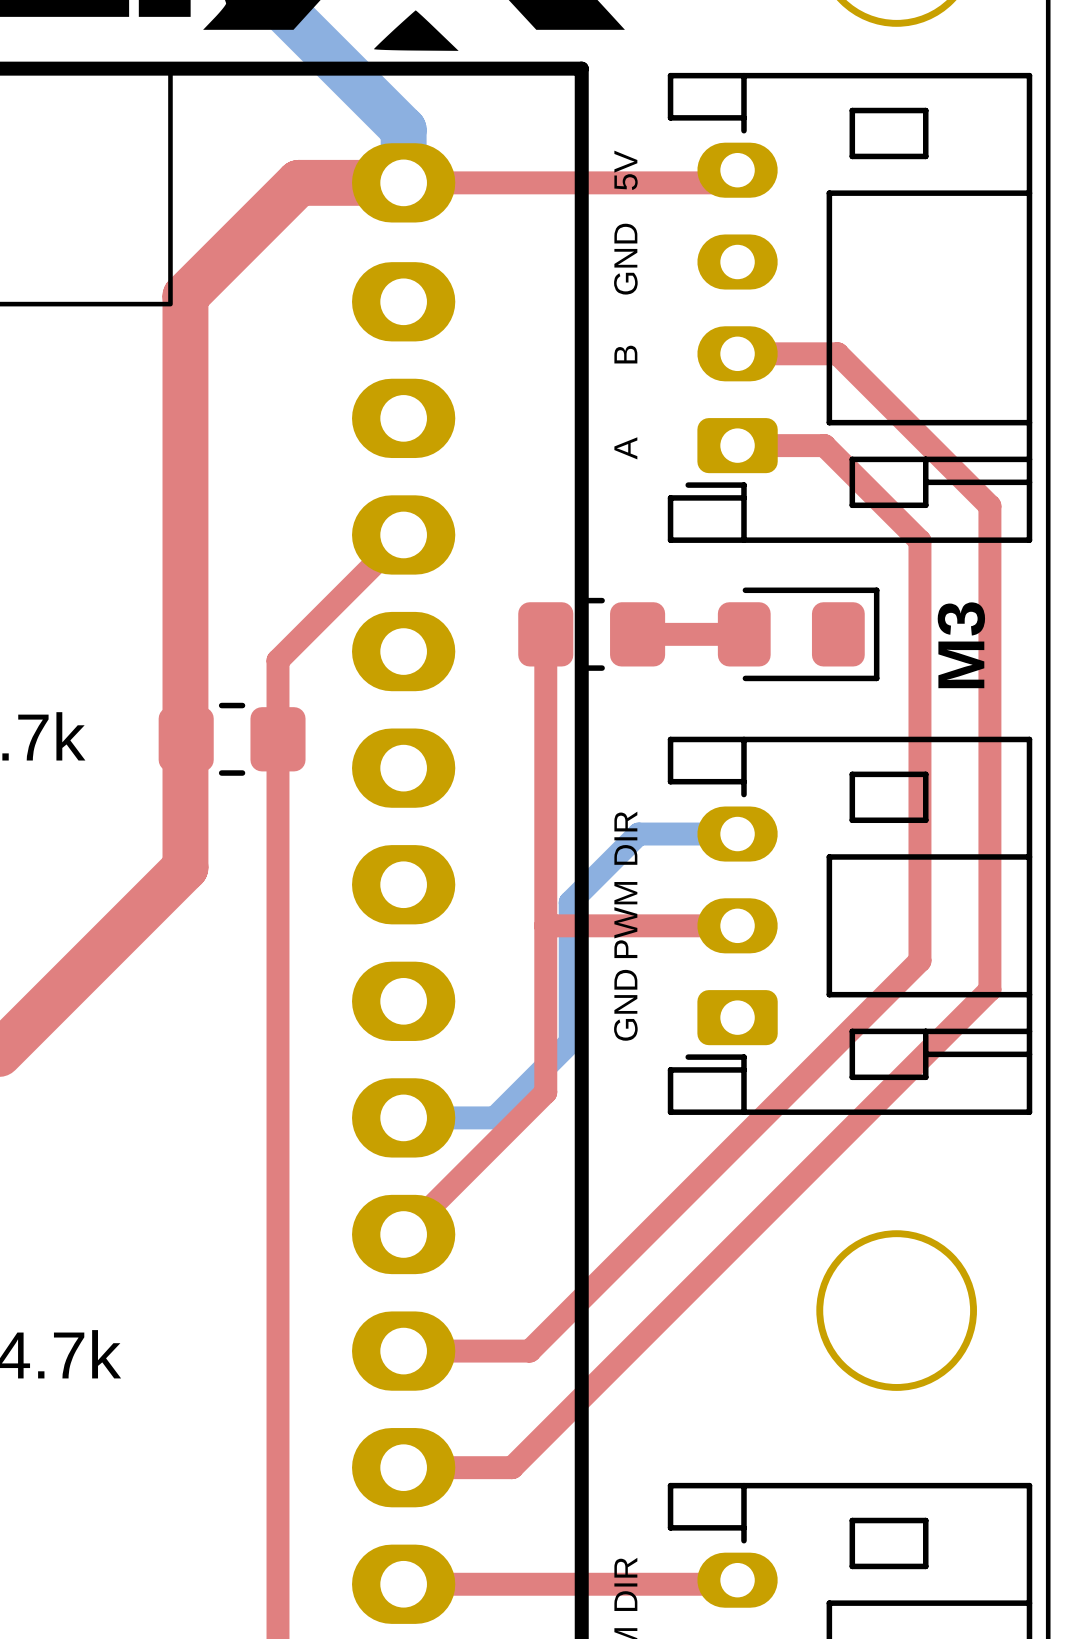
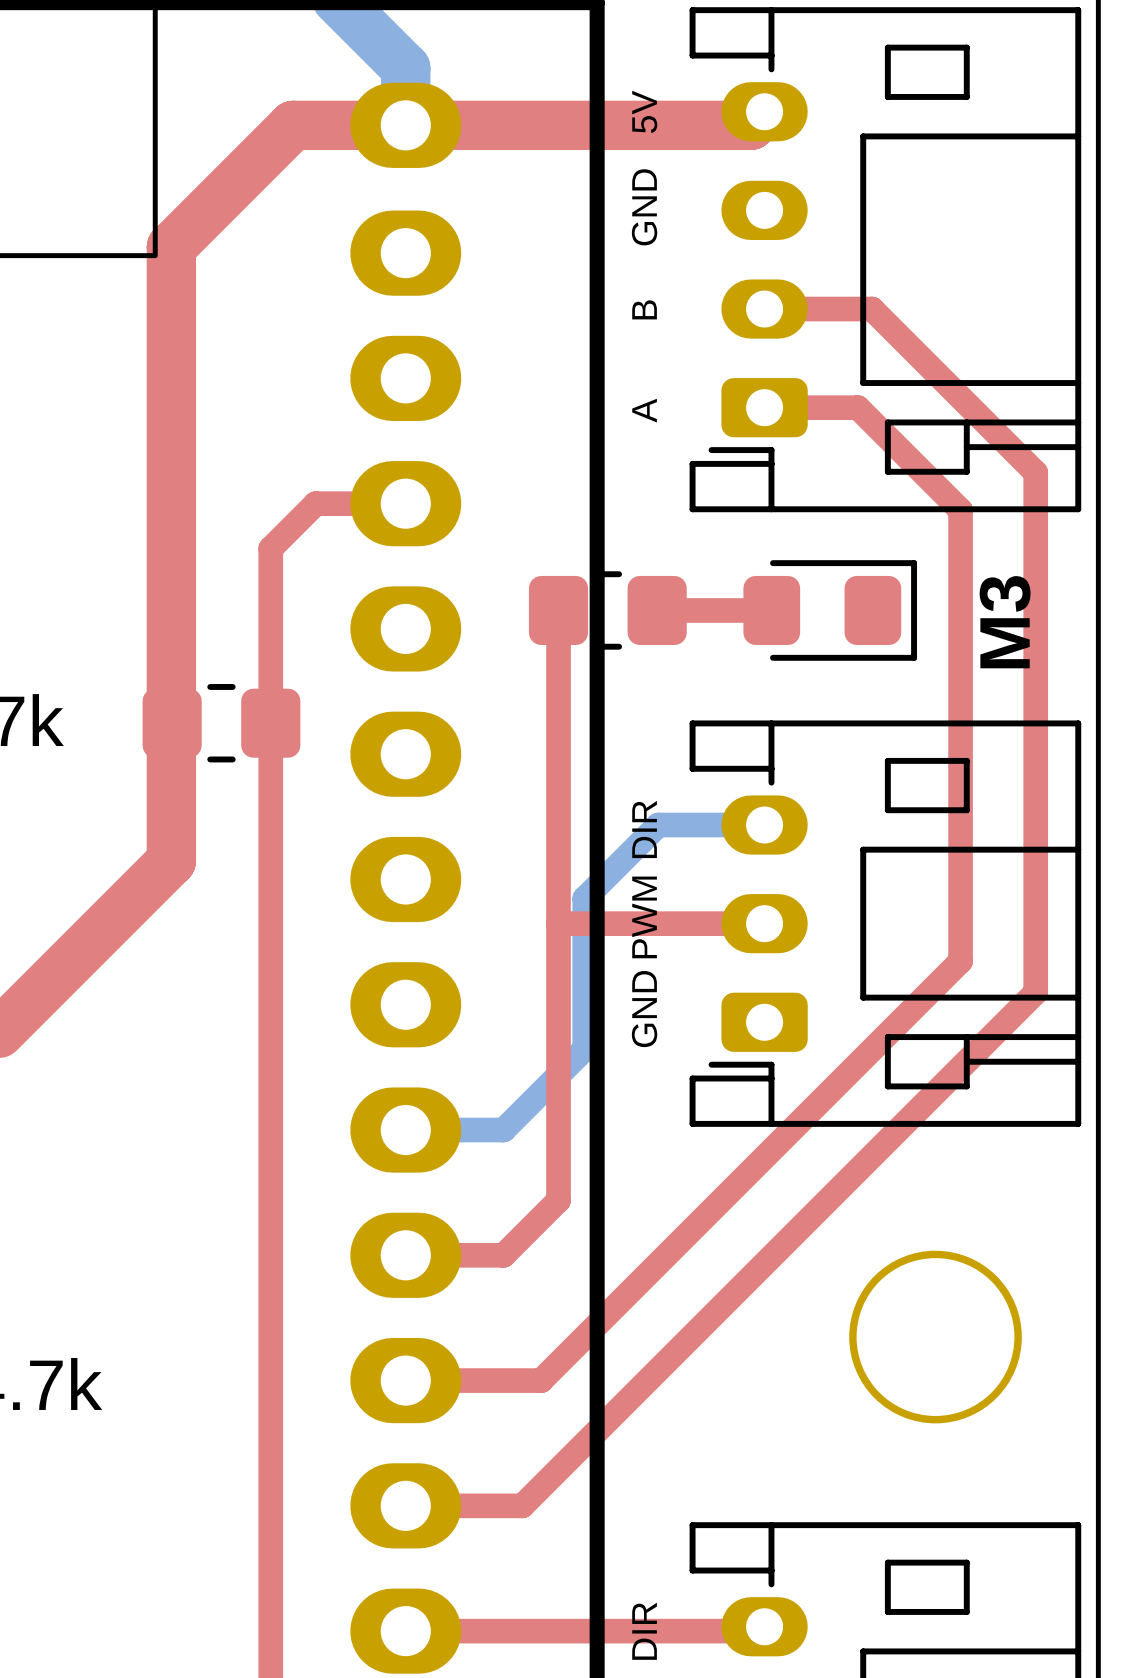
top track width: thin (737, 170) (724, 182) (403, 182) -> thick (764, 111) (750, 125) (405, 125)
top track: (403, 534) (277, 660) -> (405, 503) (315, 503) (270, 548) (270, 638)
top track: (545, 1092) (403, 1234) -> (558, 1102) (558, 1200) (503, 1255) (405, 1255)

